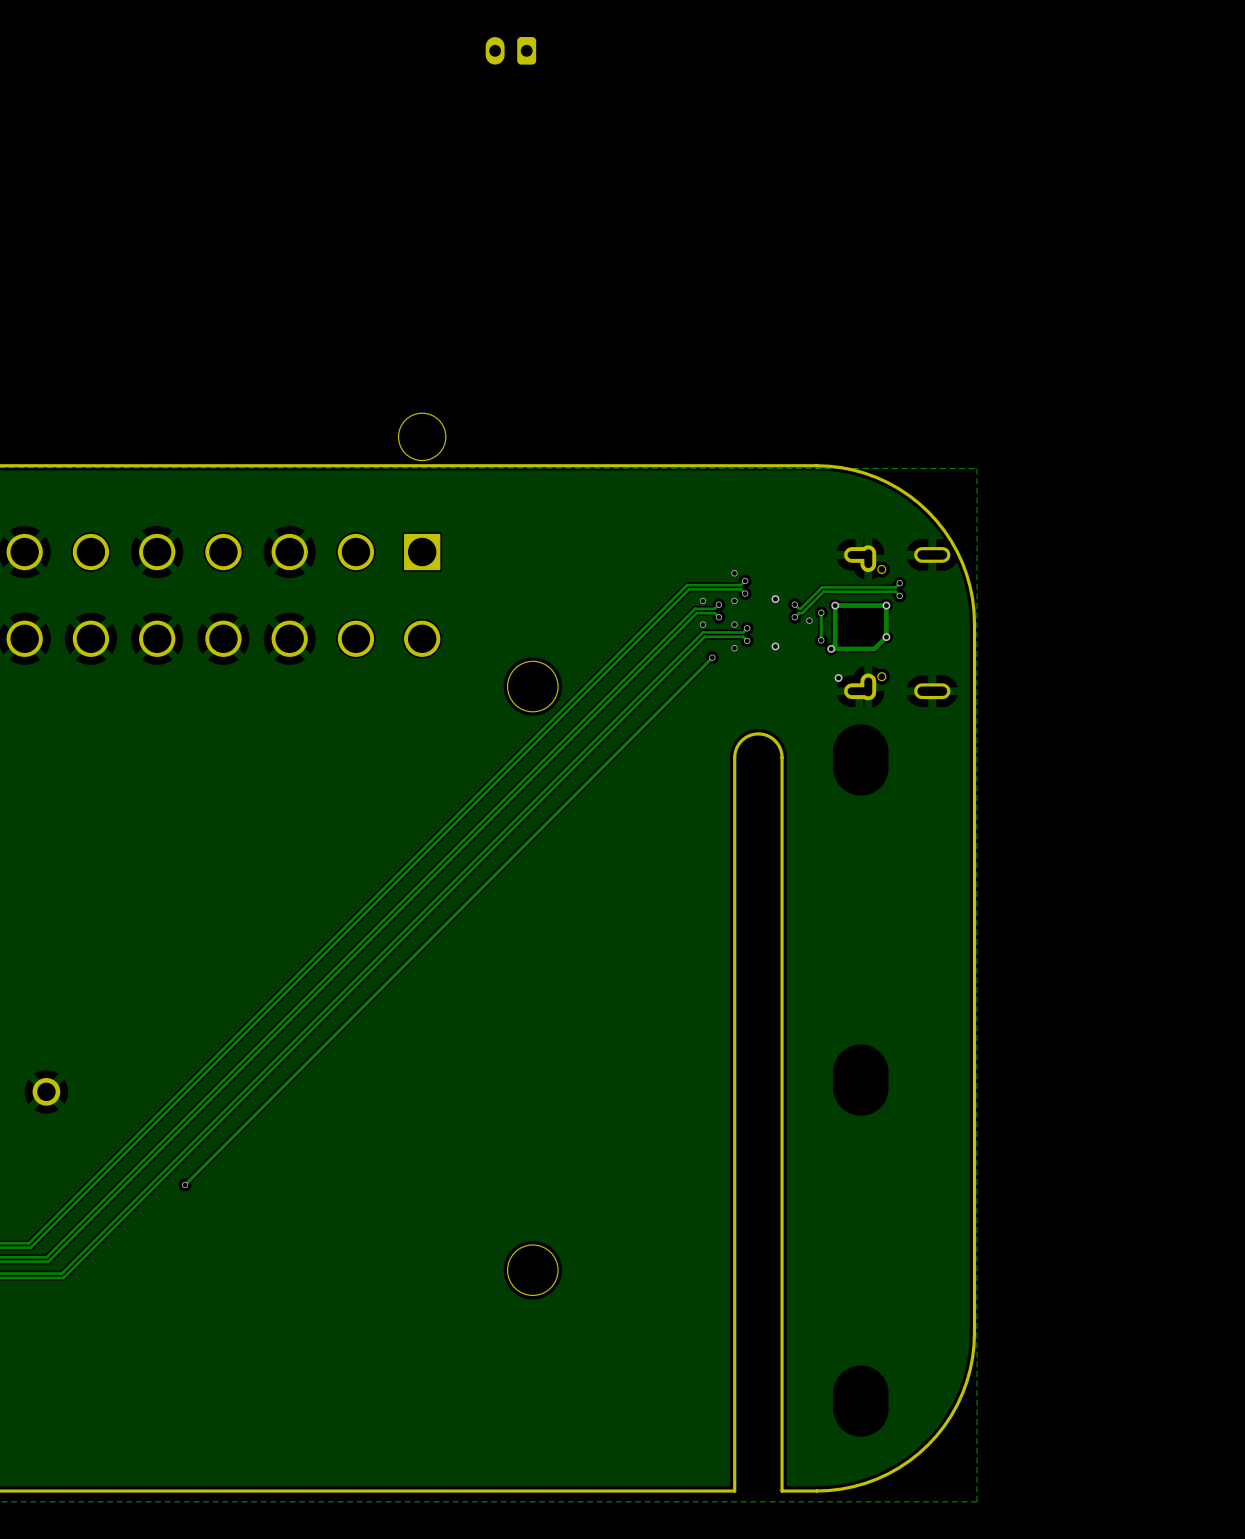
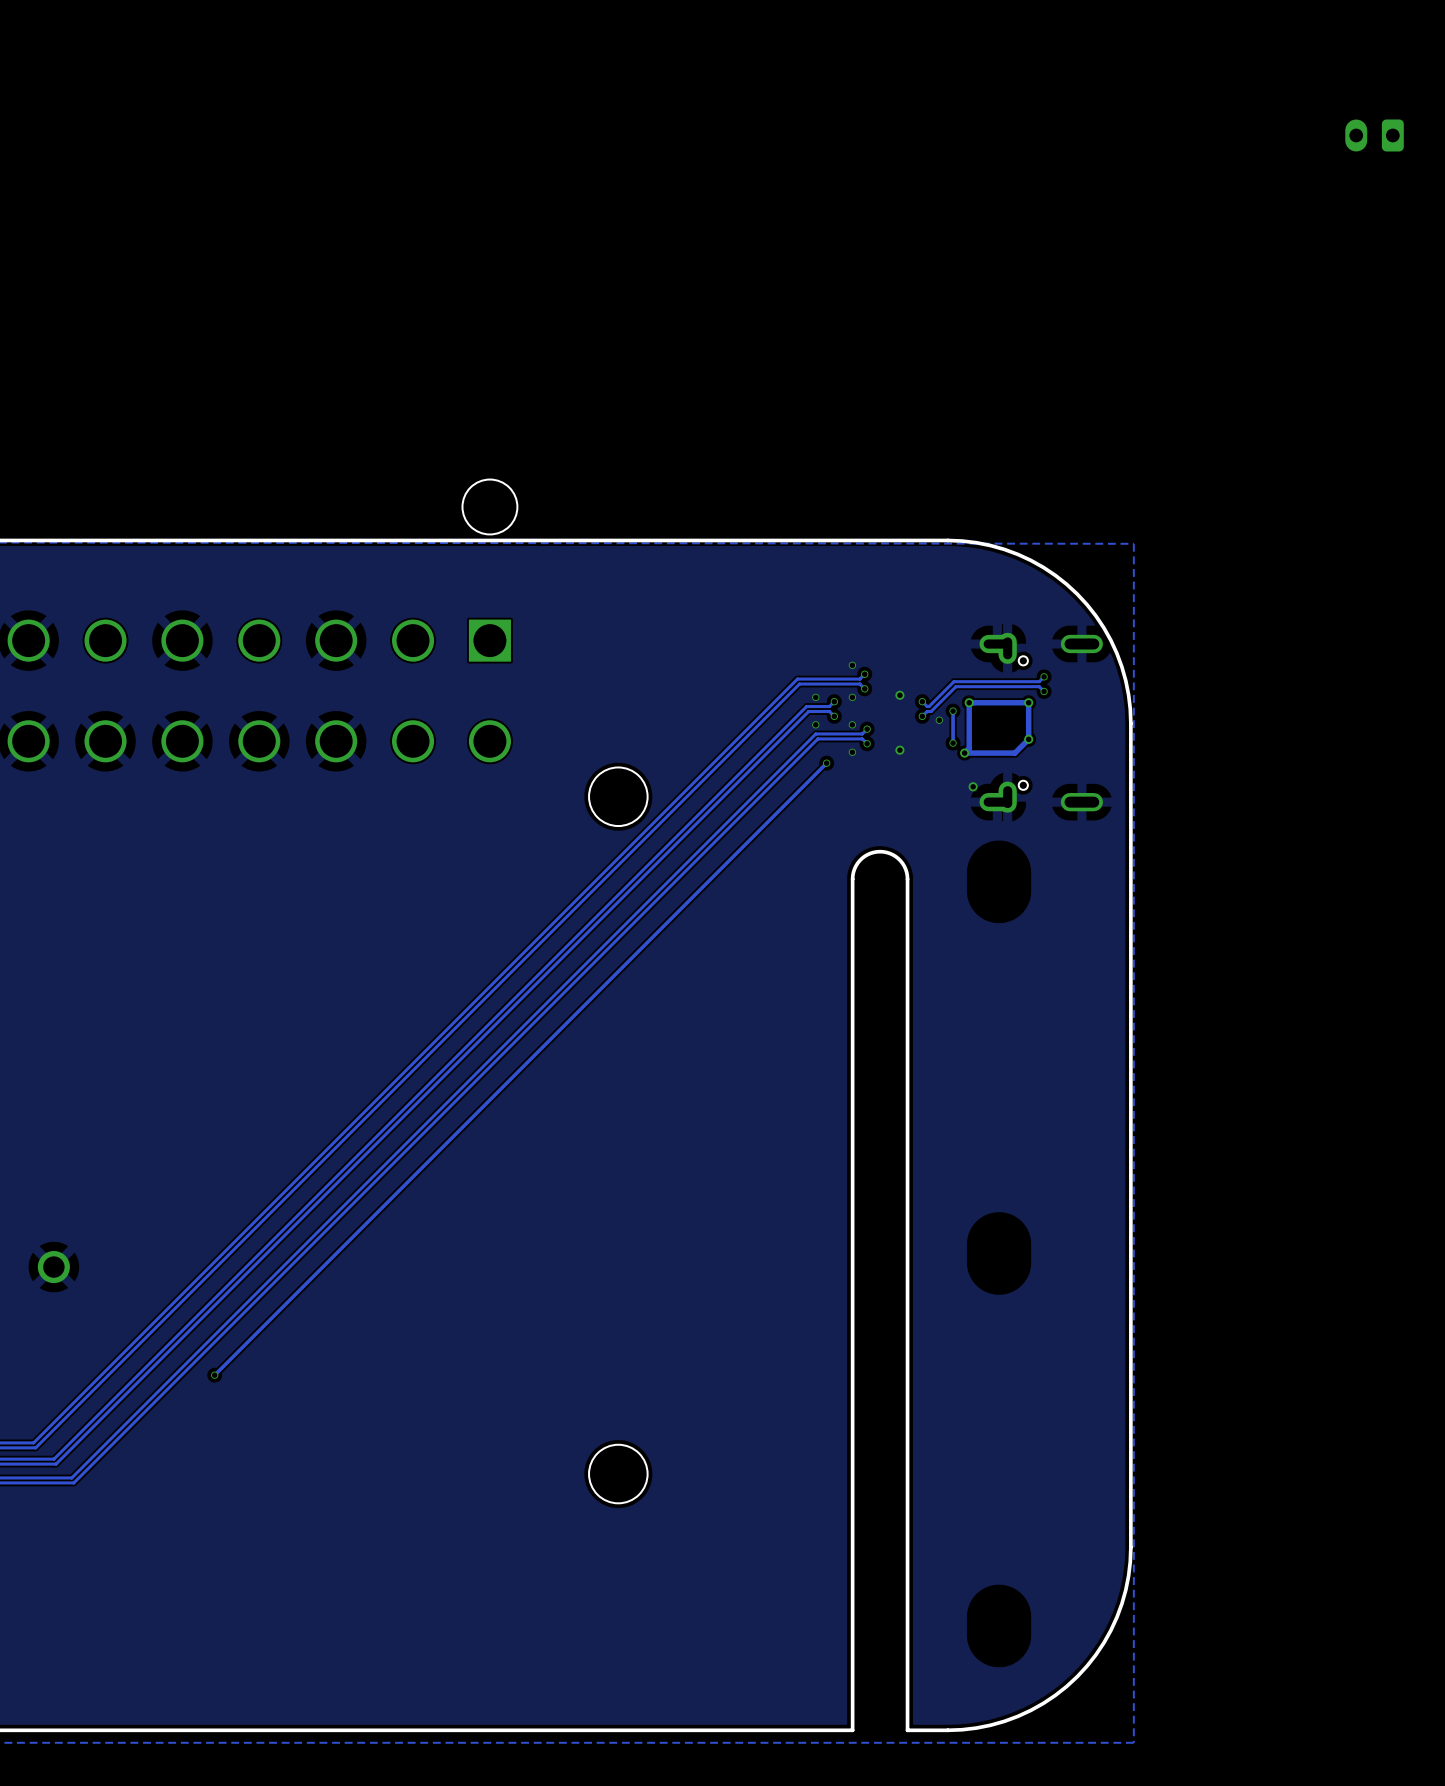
part: (510, 50) -> none
part: none -> (1374, 135)

